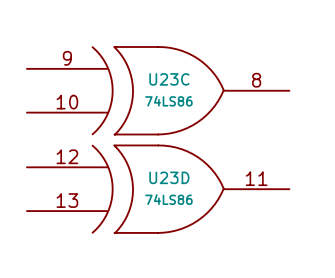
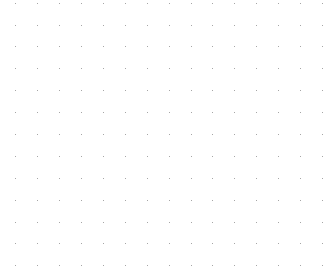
U23C: 74LS86 (158, 90) -> none
U23D: 74LS86 (158, 189) -> none

